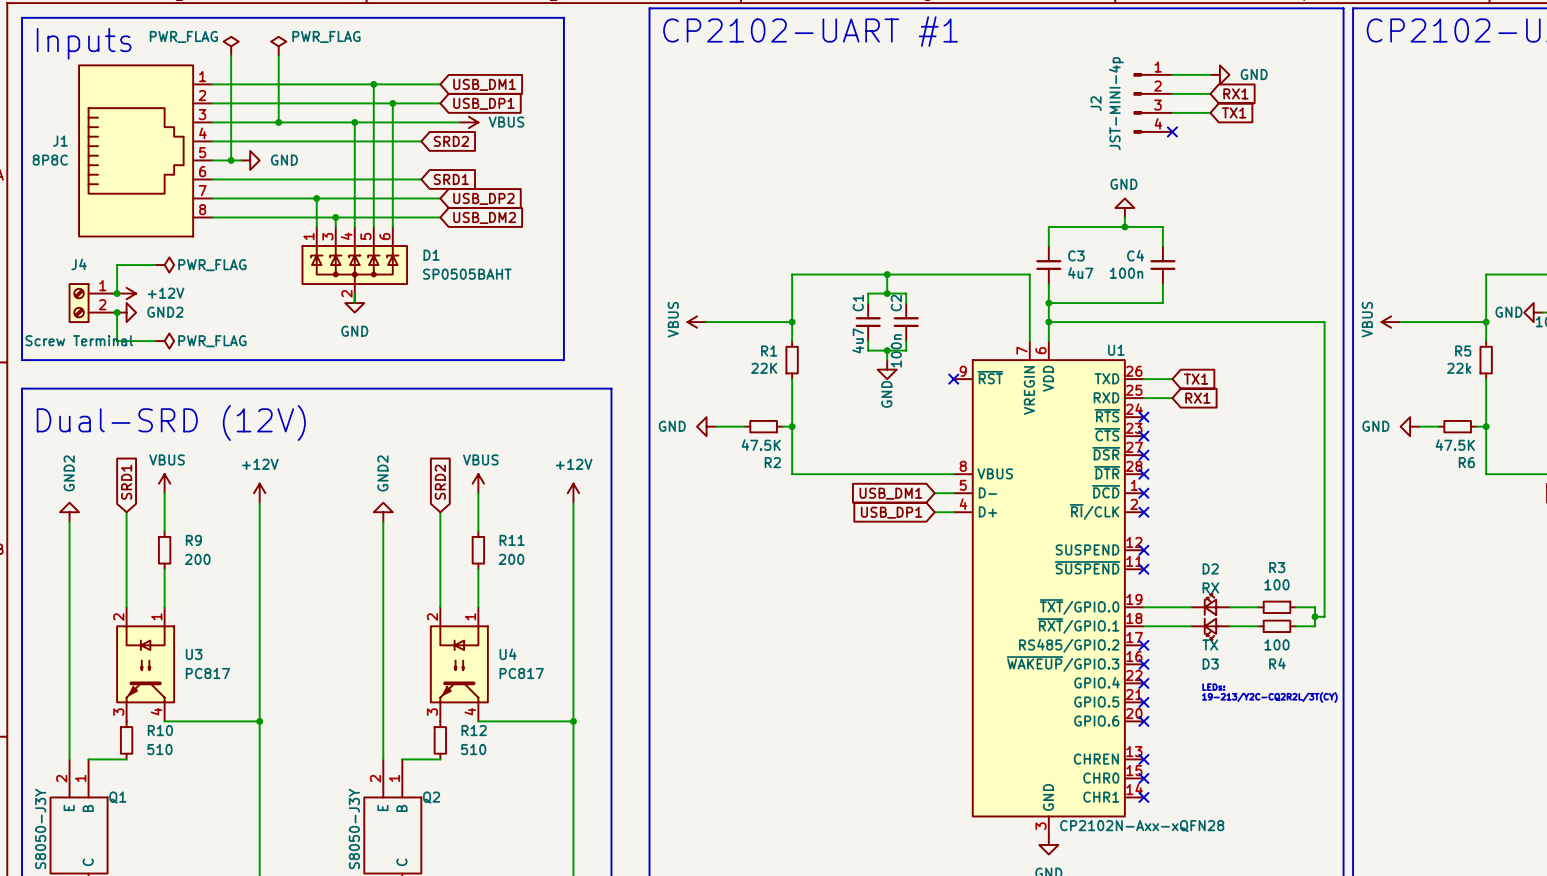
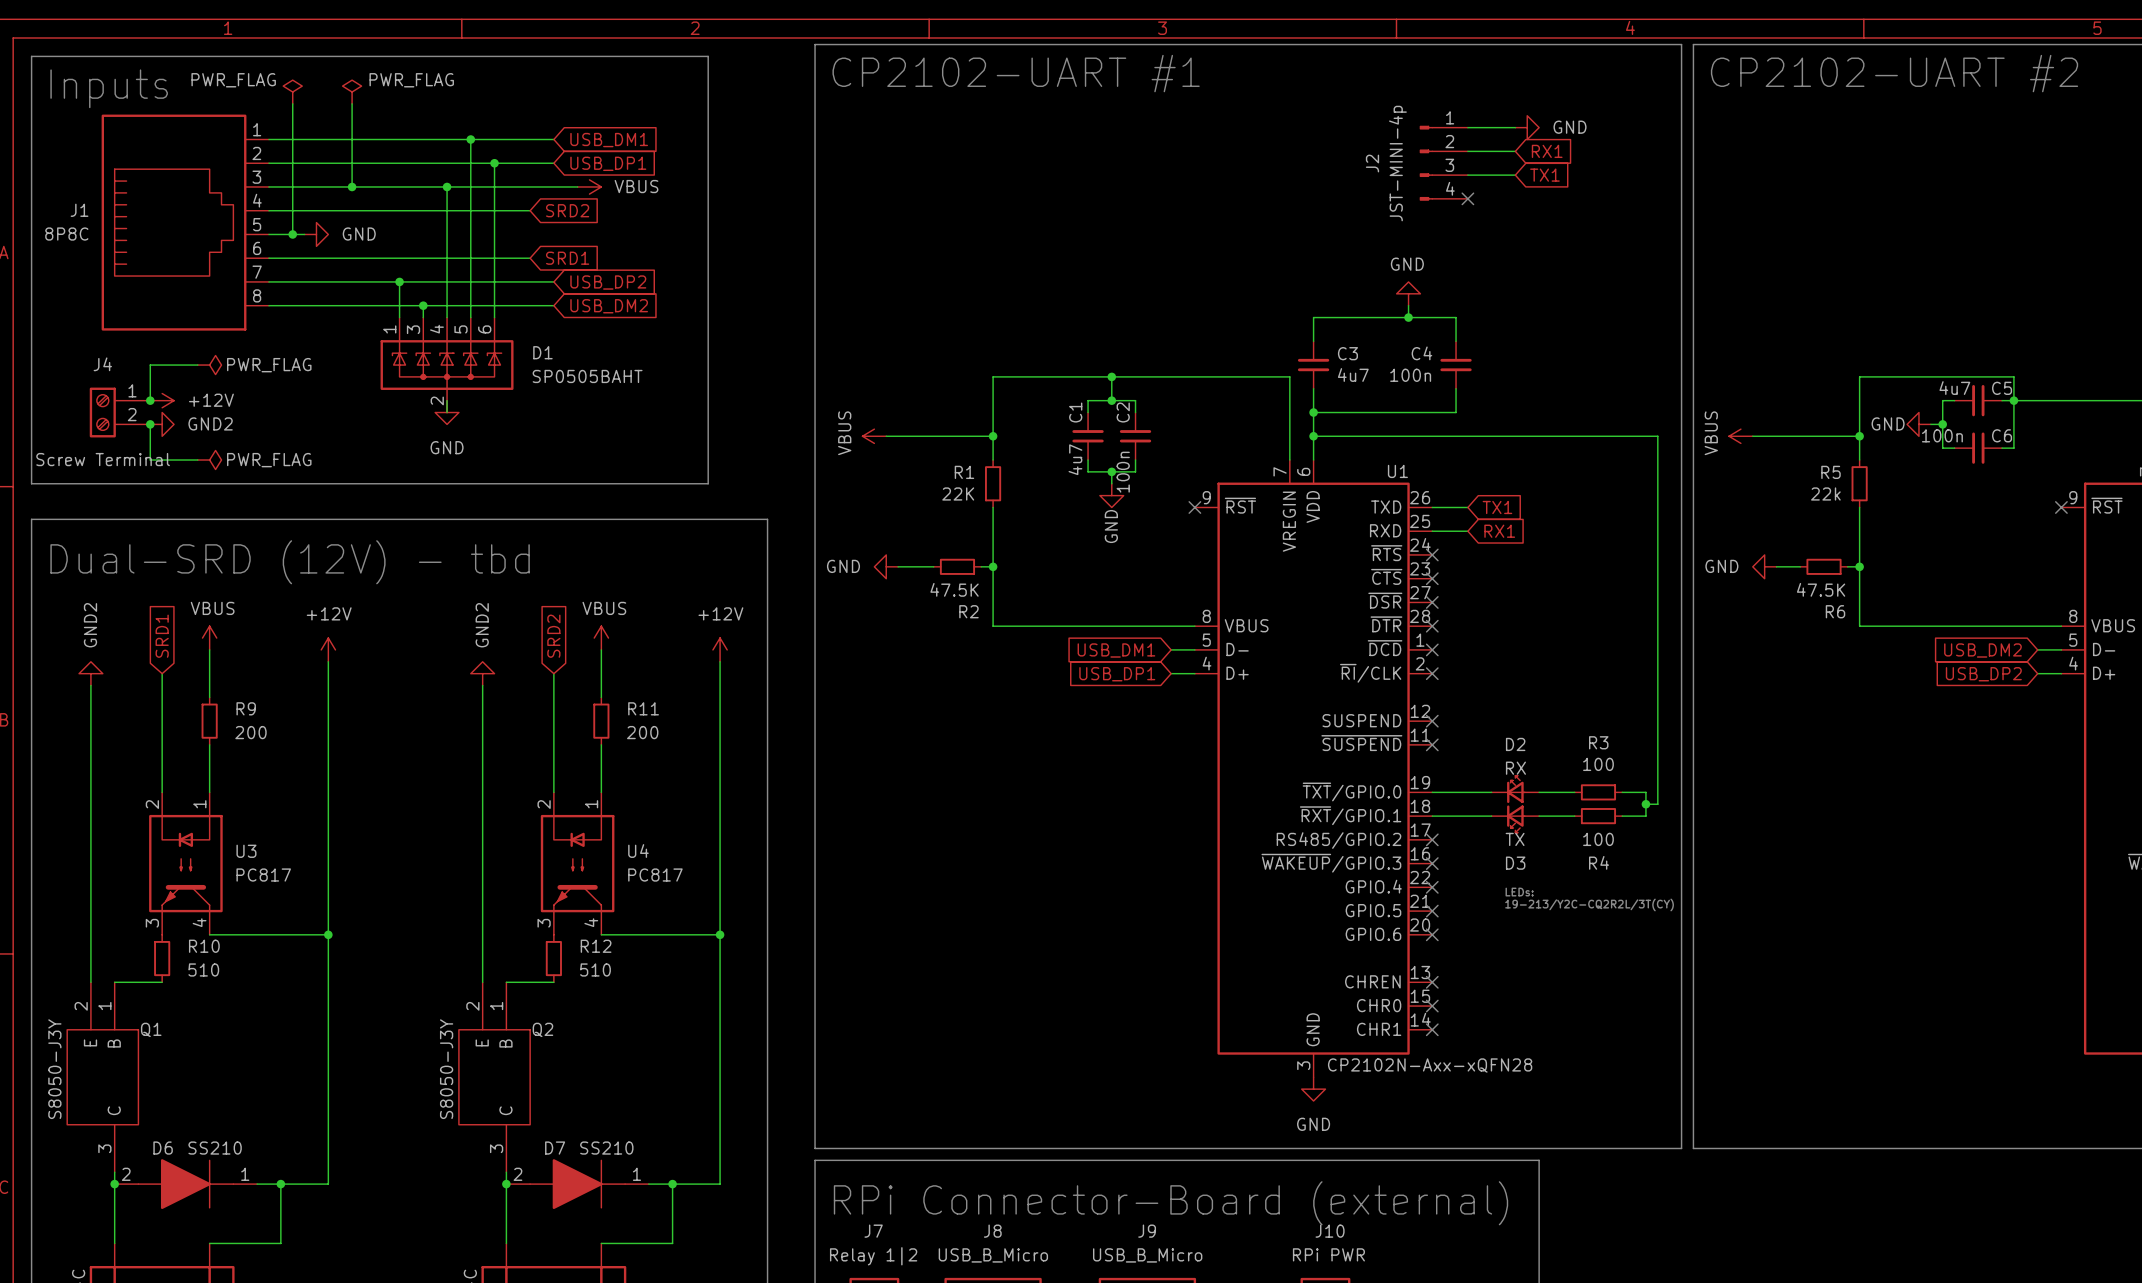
text: Dual-SRD (12V) (171, 422) -> Dual-SRD (12V) - tbd (290, 562)

